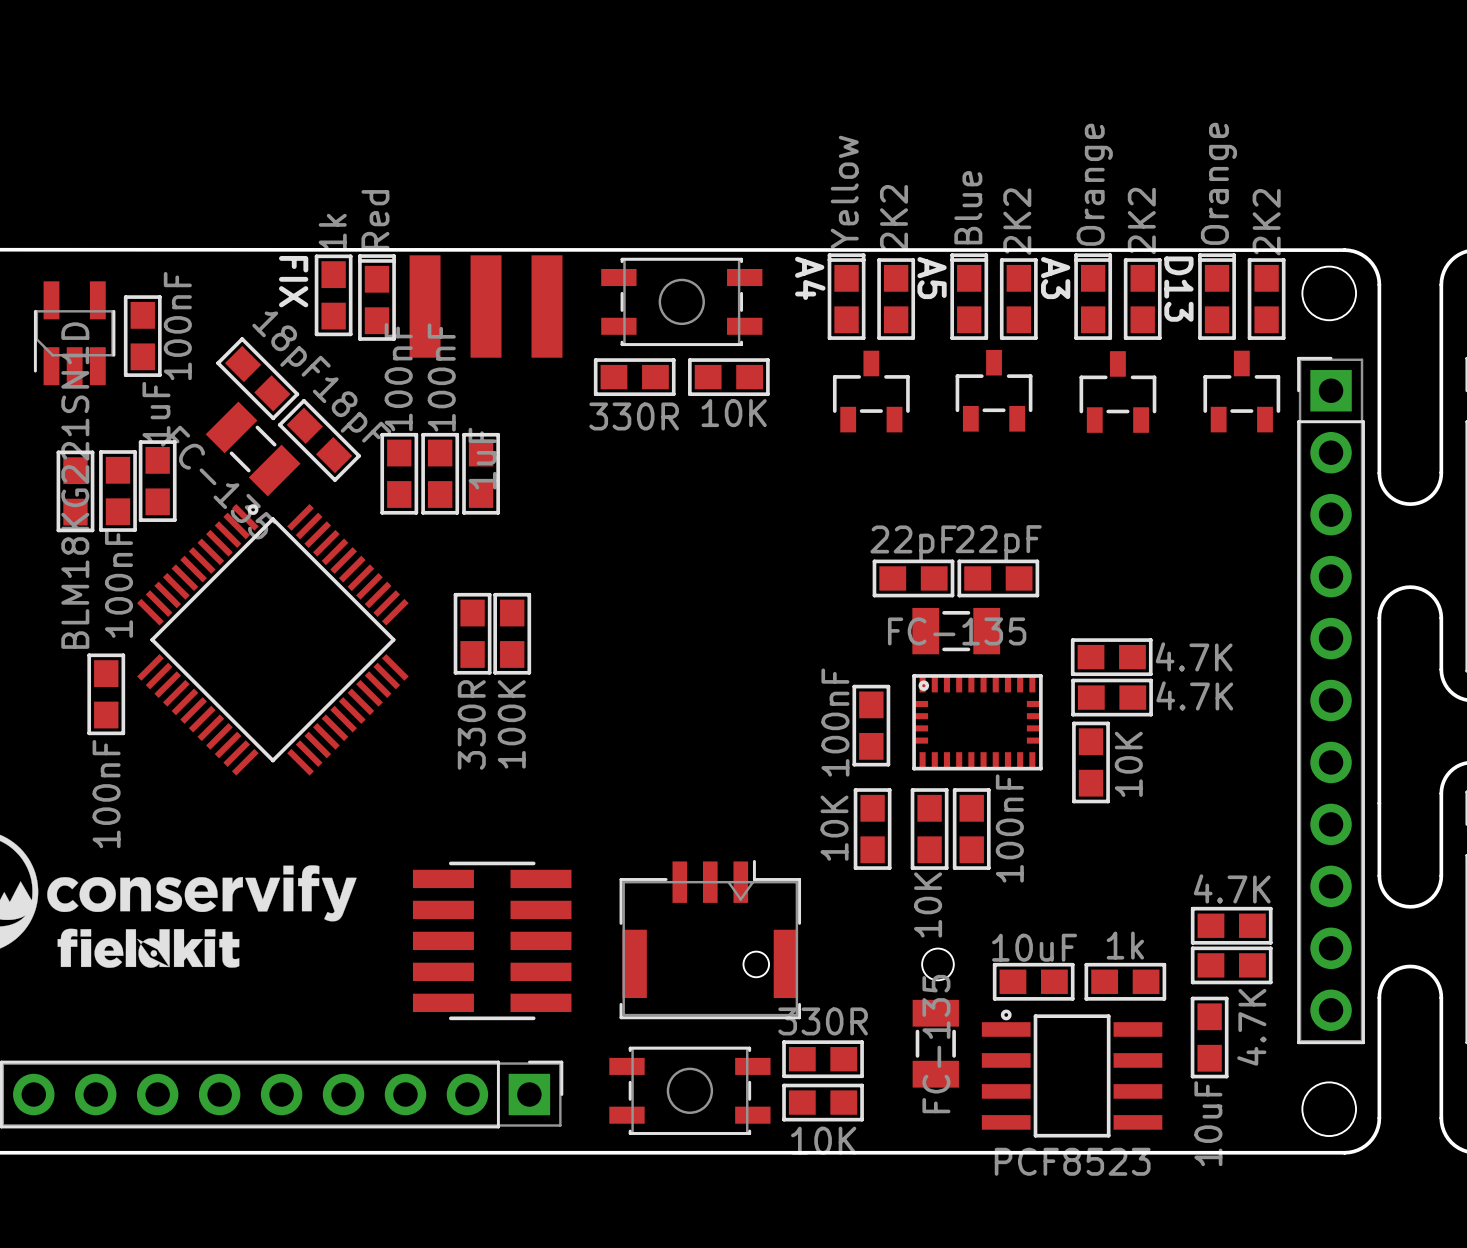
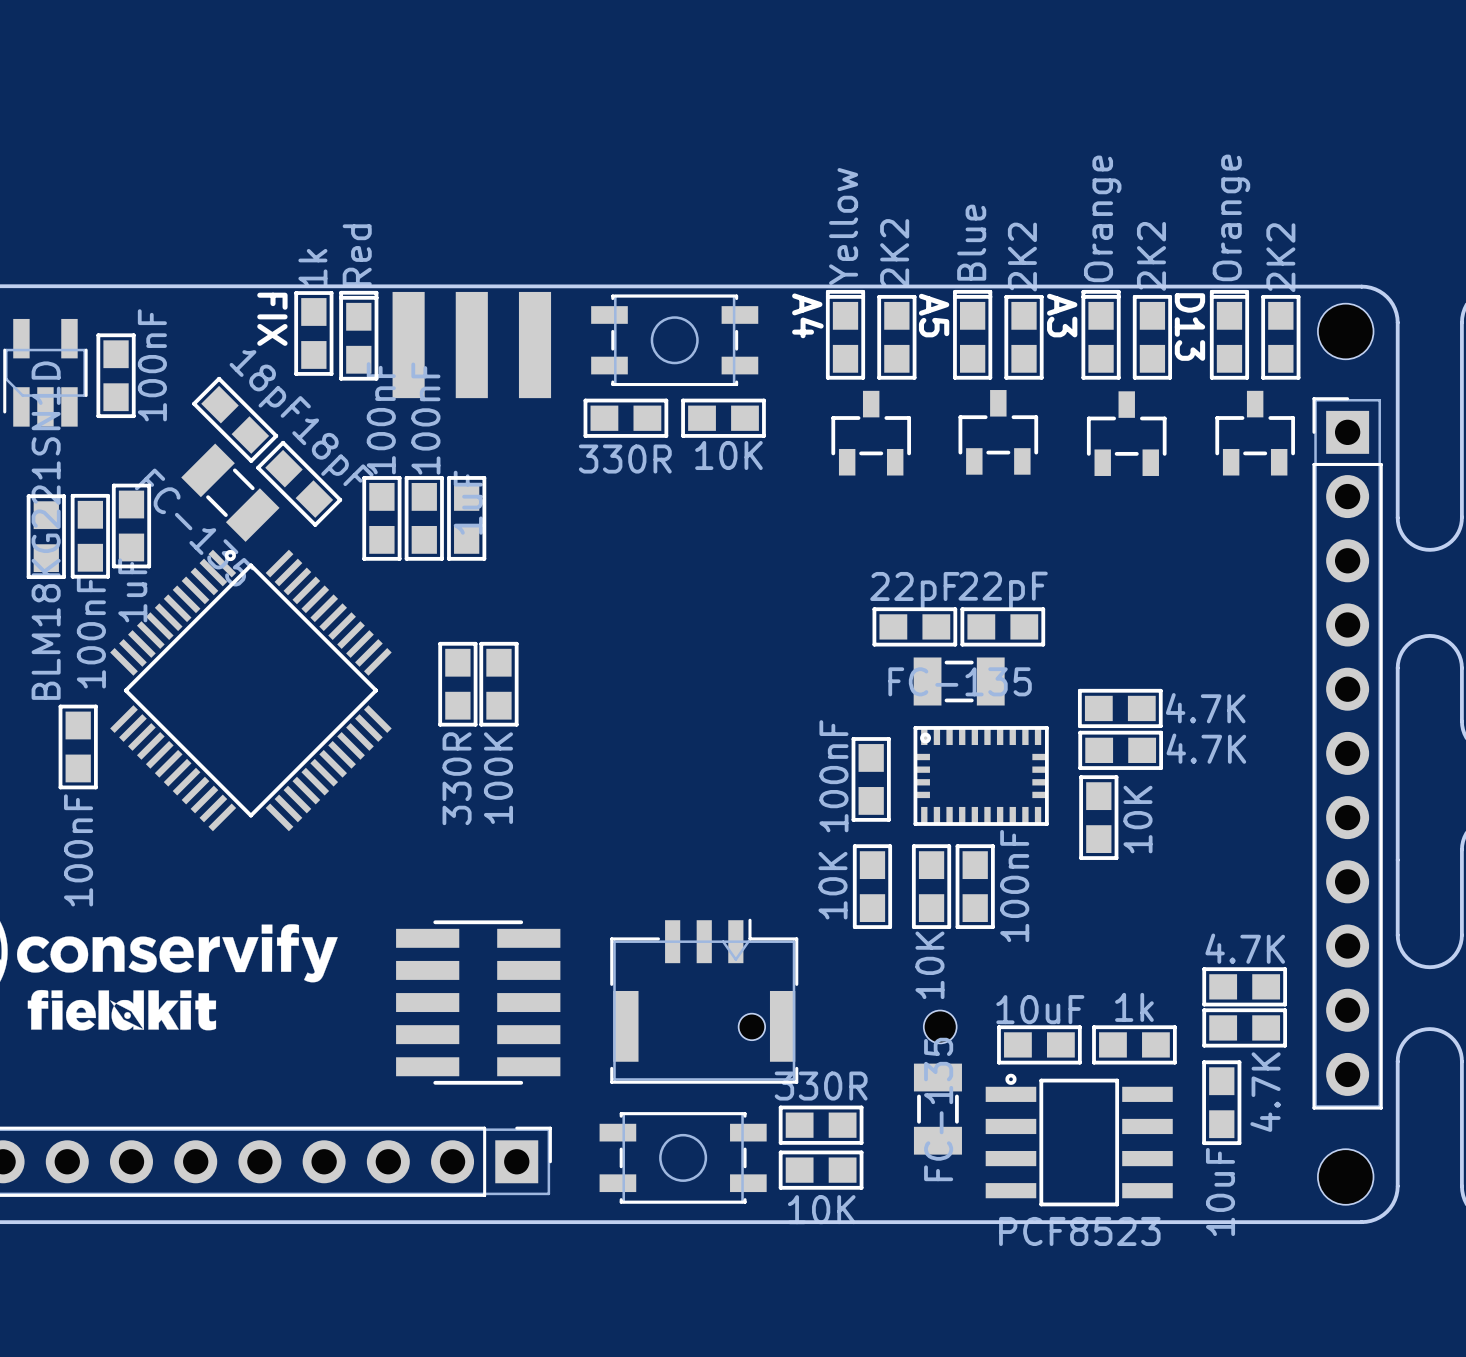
part value position: 1uF (156, 412) -> 1uF (132, 590)

